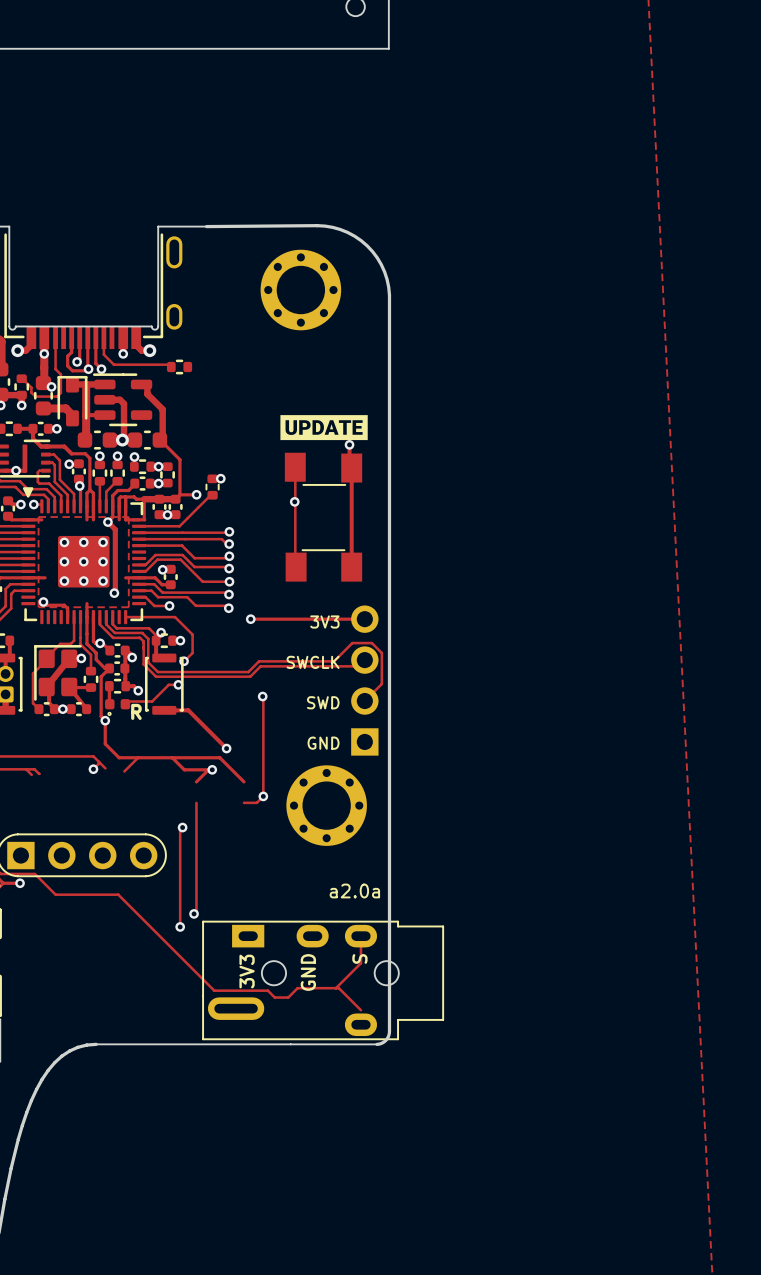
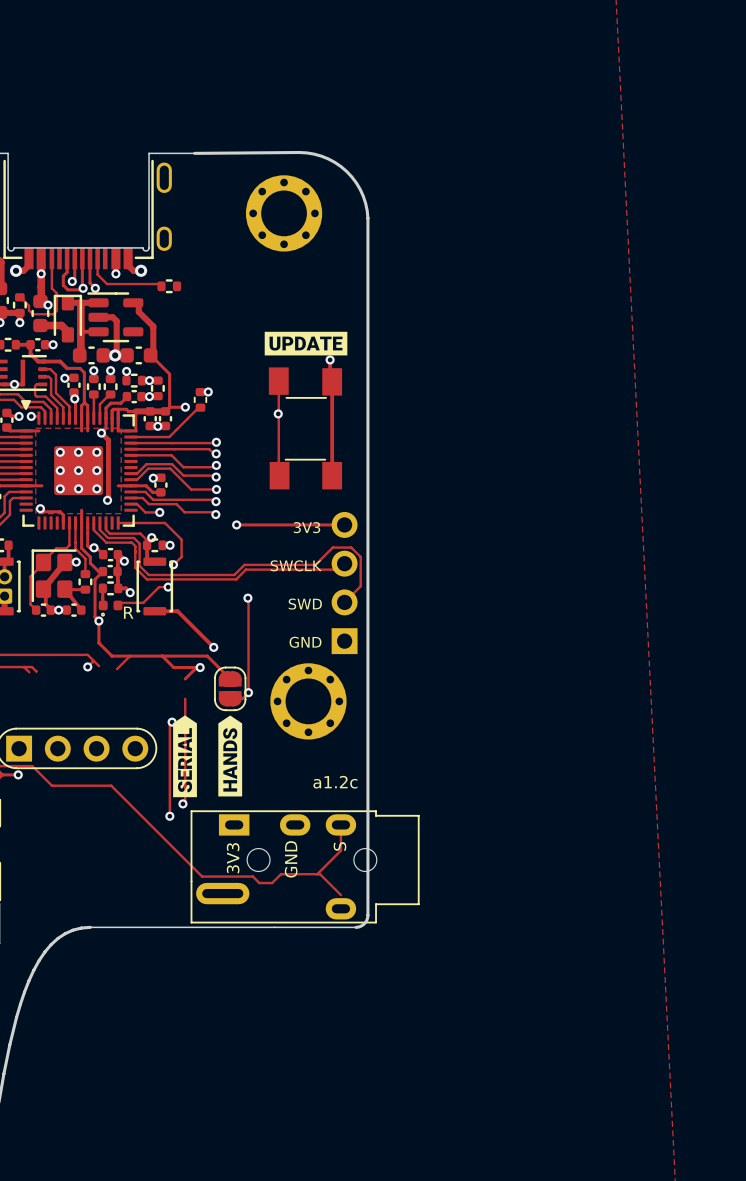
part: none -> (230, 688)
drawing: none -> [173, 715, 197, 798]
drawing: none -> [218, 715, 243, 797]
text: a2.0a (354, 890) -> a1.2c (335, 782)

